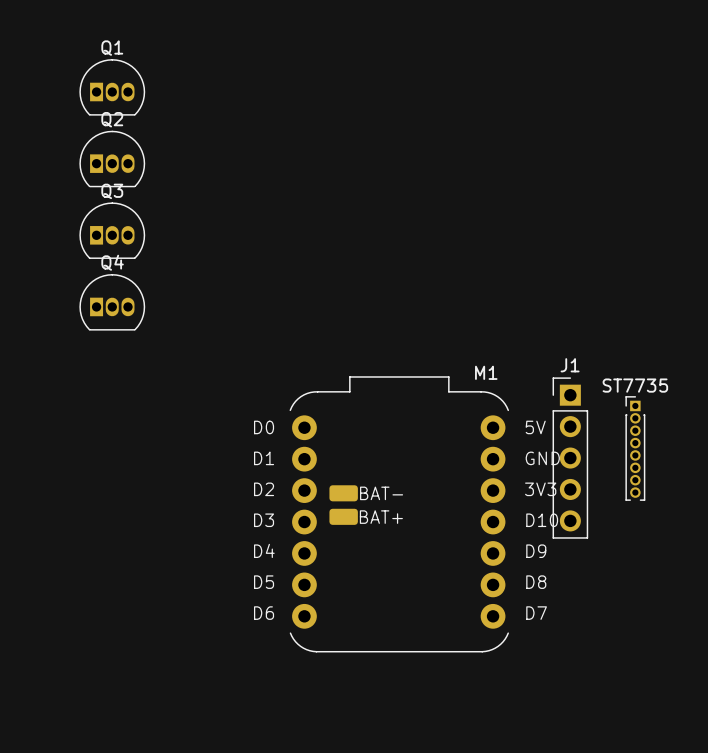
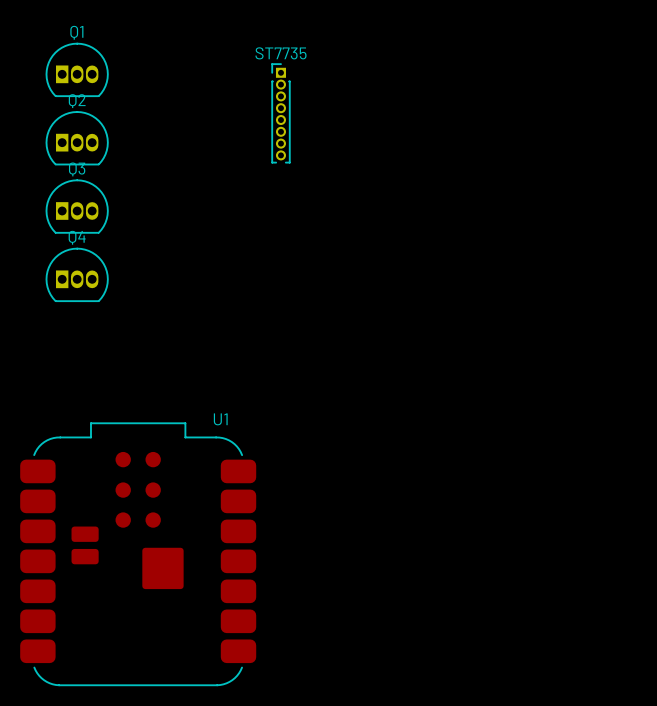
ST7735 position: (635, 448) -> (280, 113)
J1: (570, 458) -> none
M1: (399, 514) -> none
U1: none -> (138, 554)

